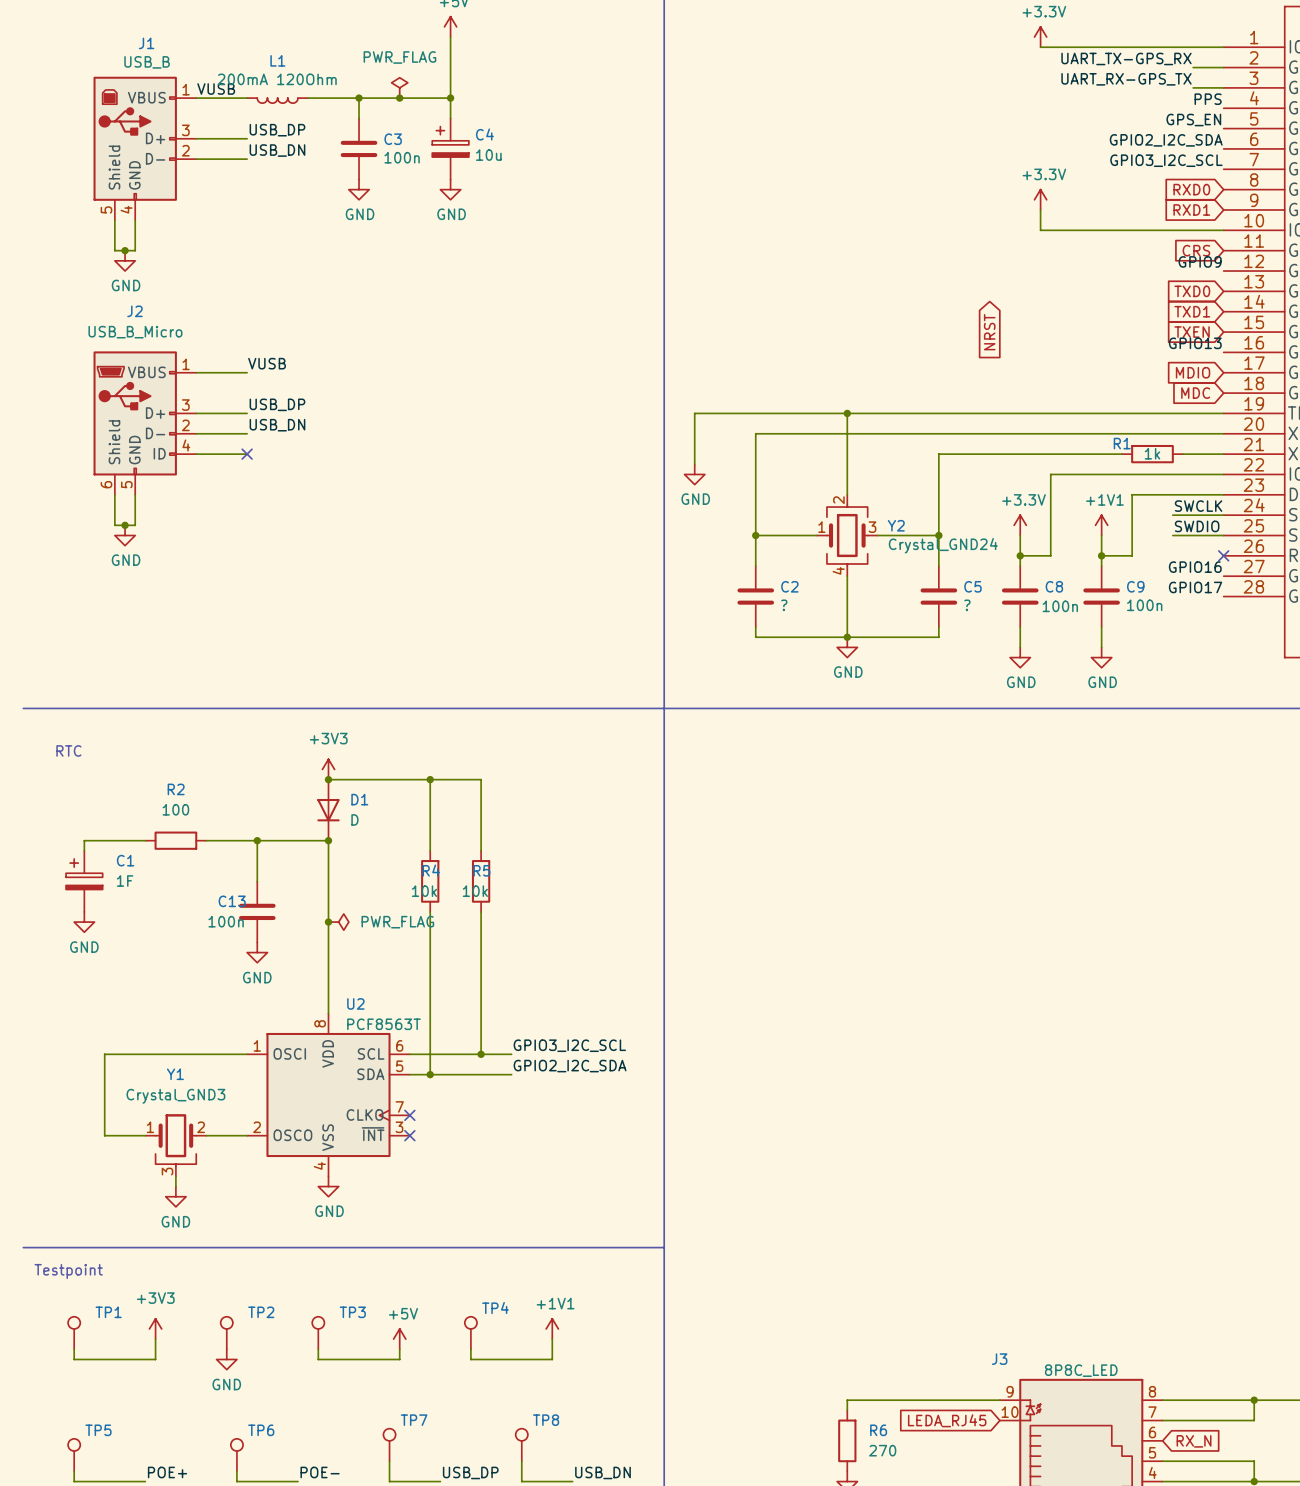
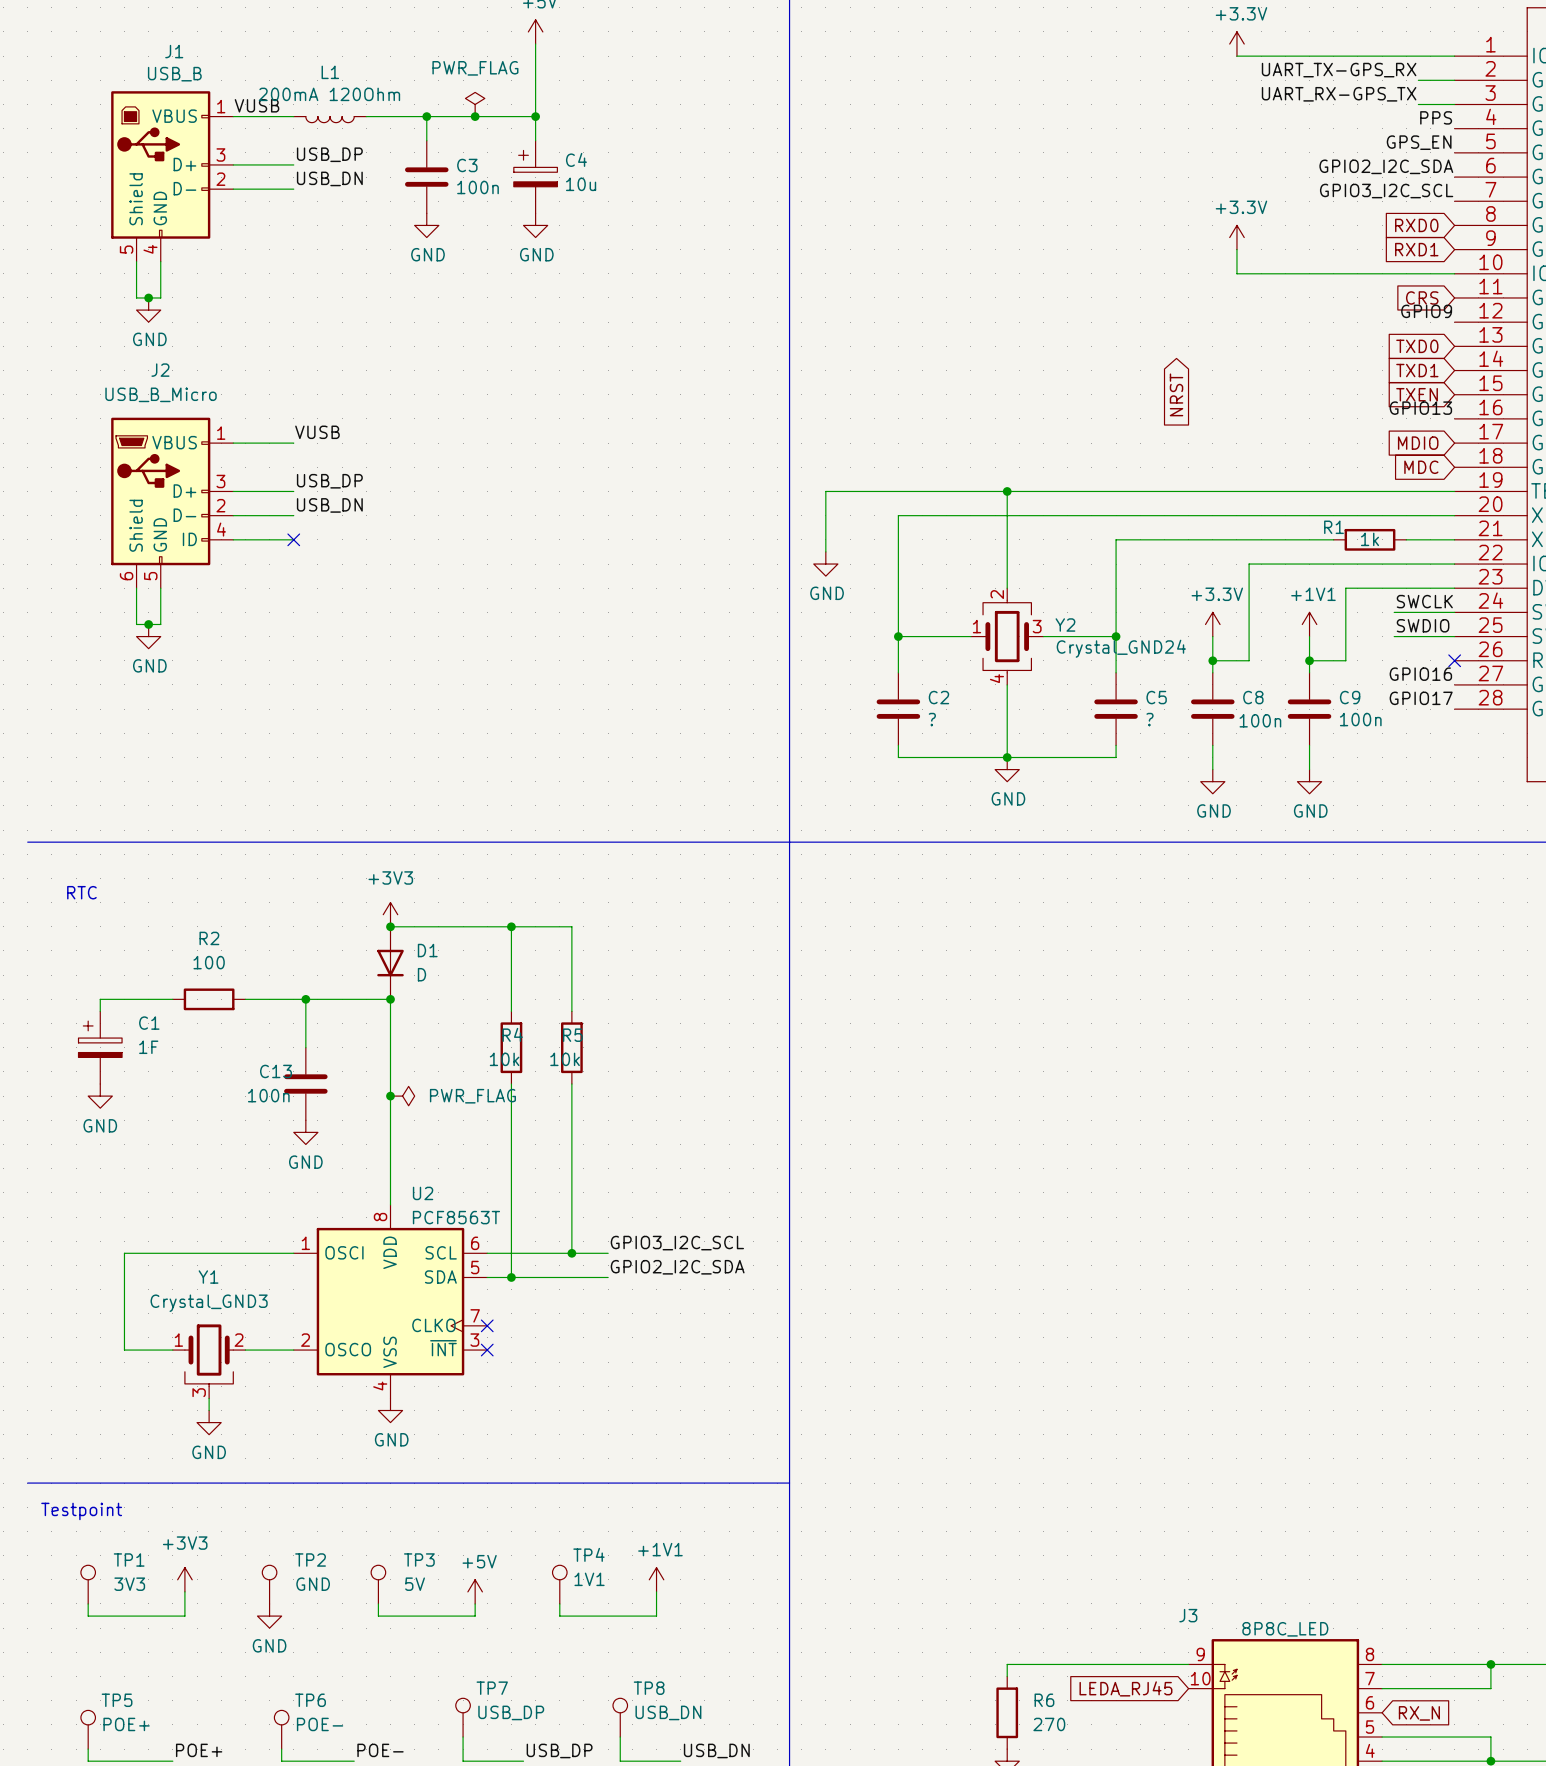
TP4 value: none -> 1V1 (589, 1579)
TP1 value: none -> 3V3 (129, 1584)
TP2 value: none -> GND (313, 1584)
TP3 value: none -> 5V (415, 1584)
TP7 value: none -> USB_DP (511, 1712)
TP8 value: none -> USB_DN (668, 1712)
TP5 value: none -> POE+ (126, 1724)
TP6 value: none -> POE- (320, 1724)

